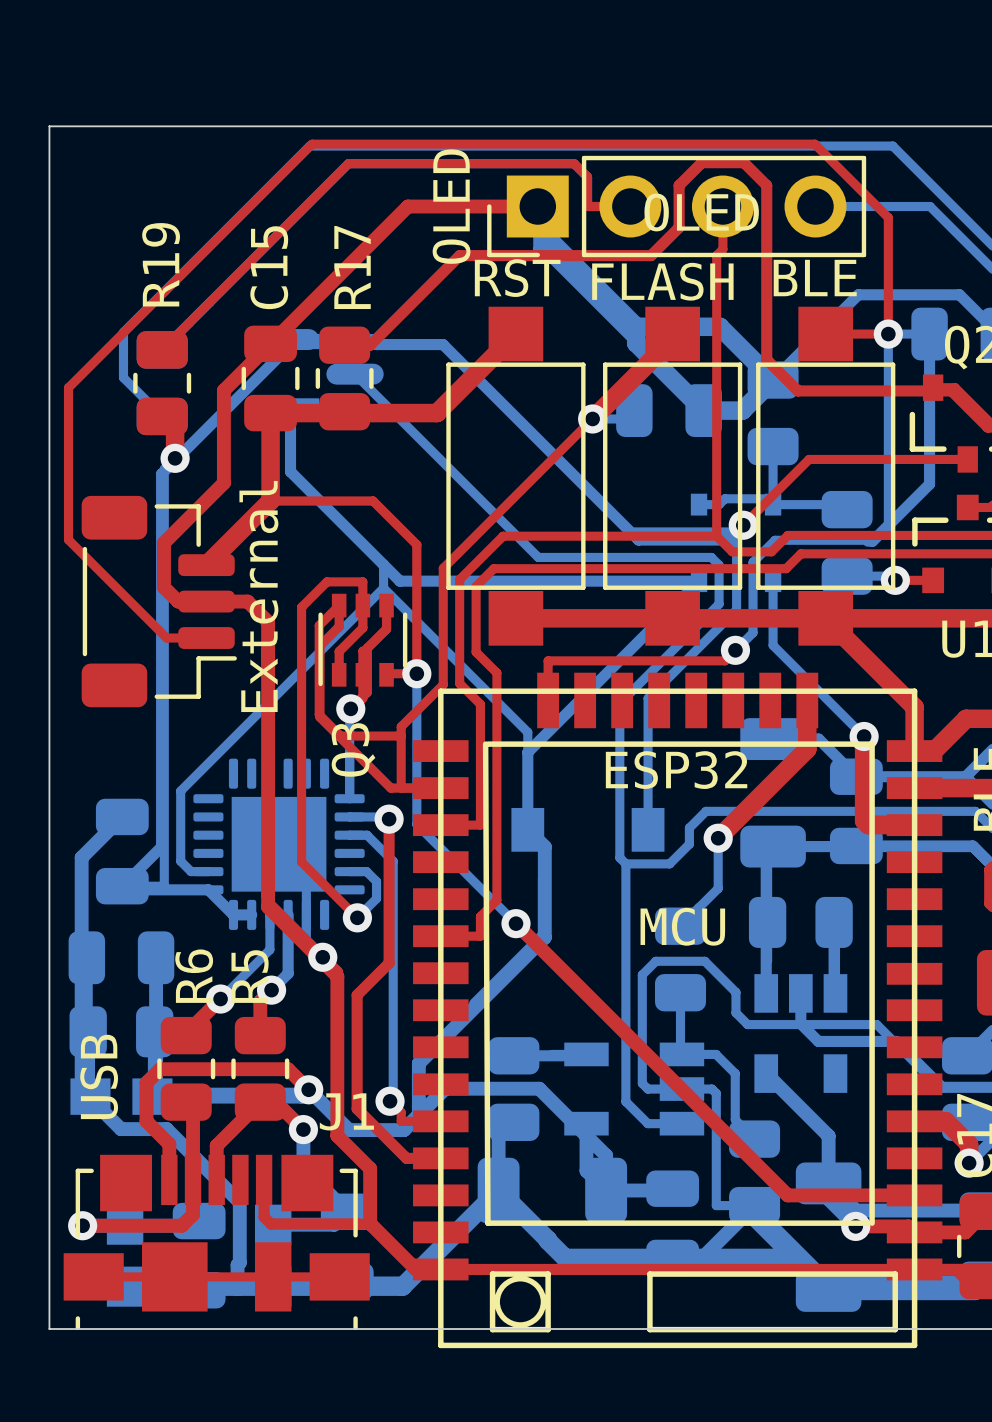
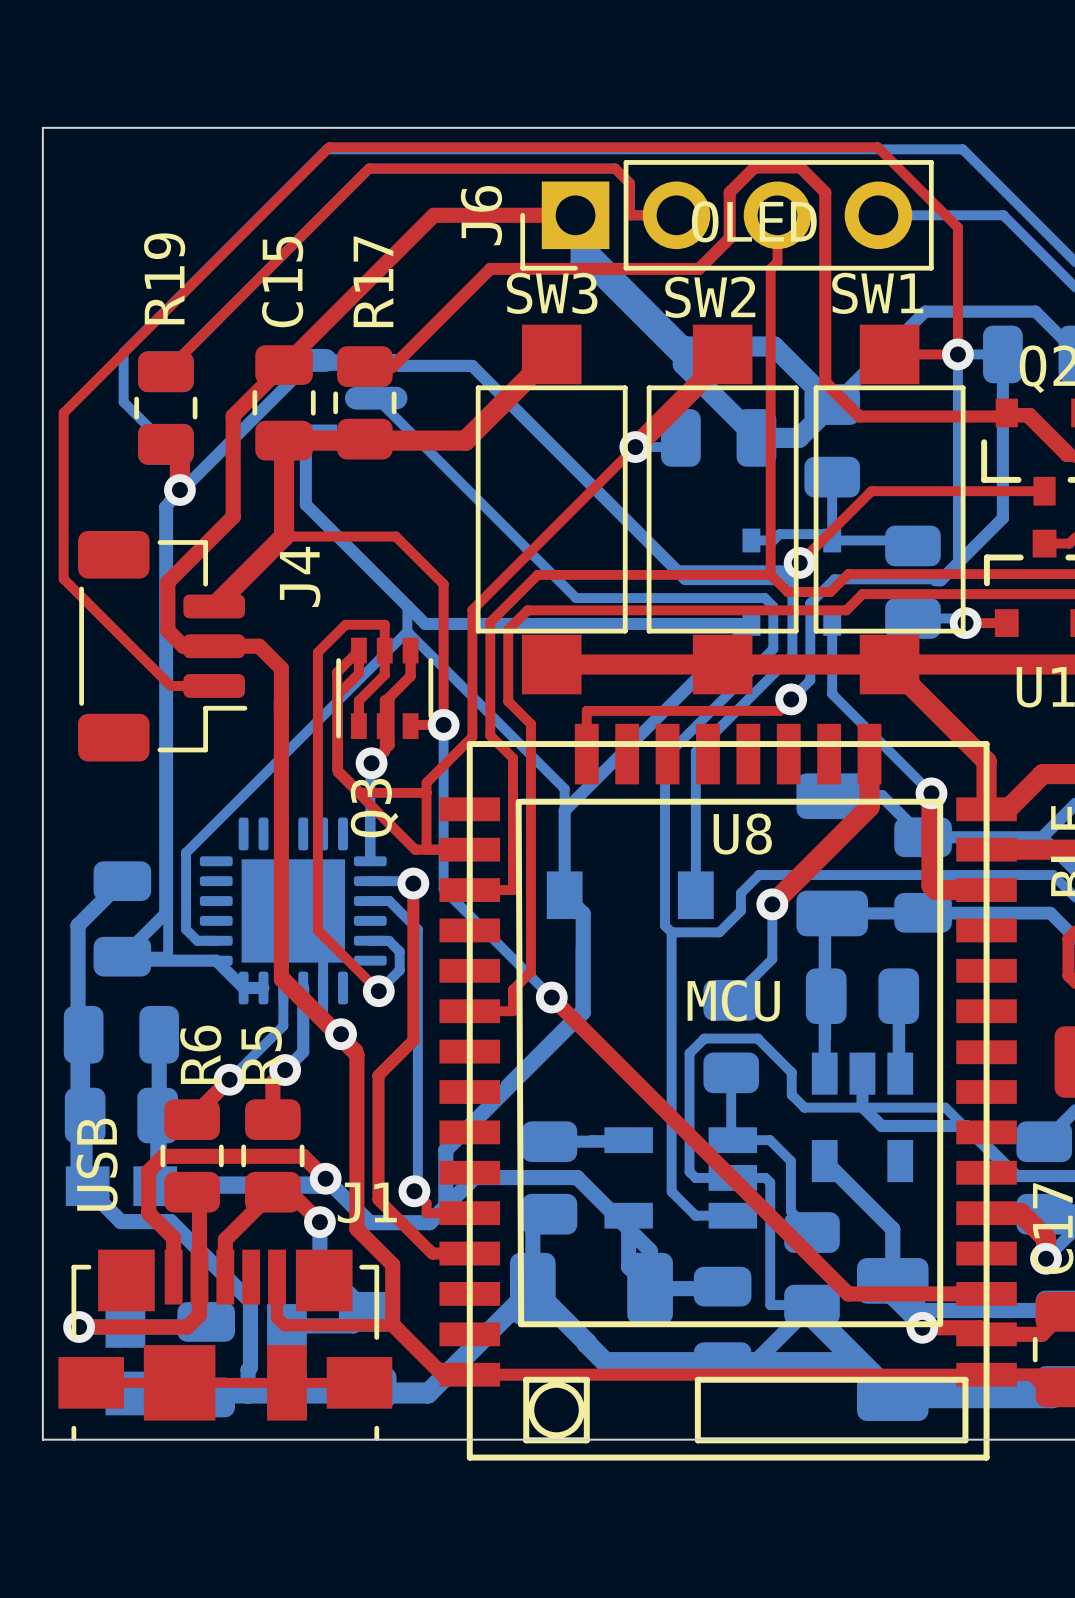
OLED name: OLED (451, 206) -> J6 (481, 215)
RST name: RST (517, 278) -> SW3 (552, 293)
BLE name: BLE (815, 278) -> SW1 (877, 293)
FLASH name: FLASH (662, 281) -> SW2 (710, 297)
External name: External (258, 596) -> J4 (300, 576)
ESP32 name: ESP32 (676, 770) -> U8 (742, 833)

